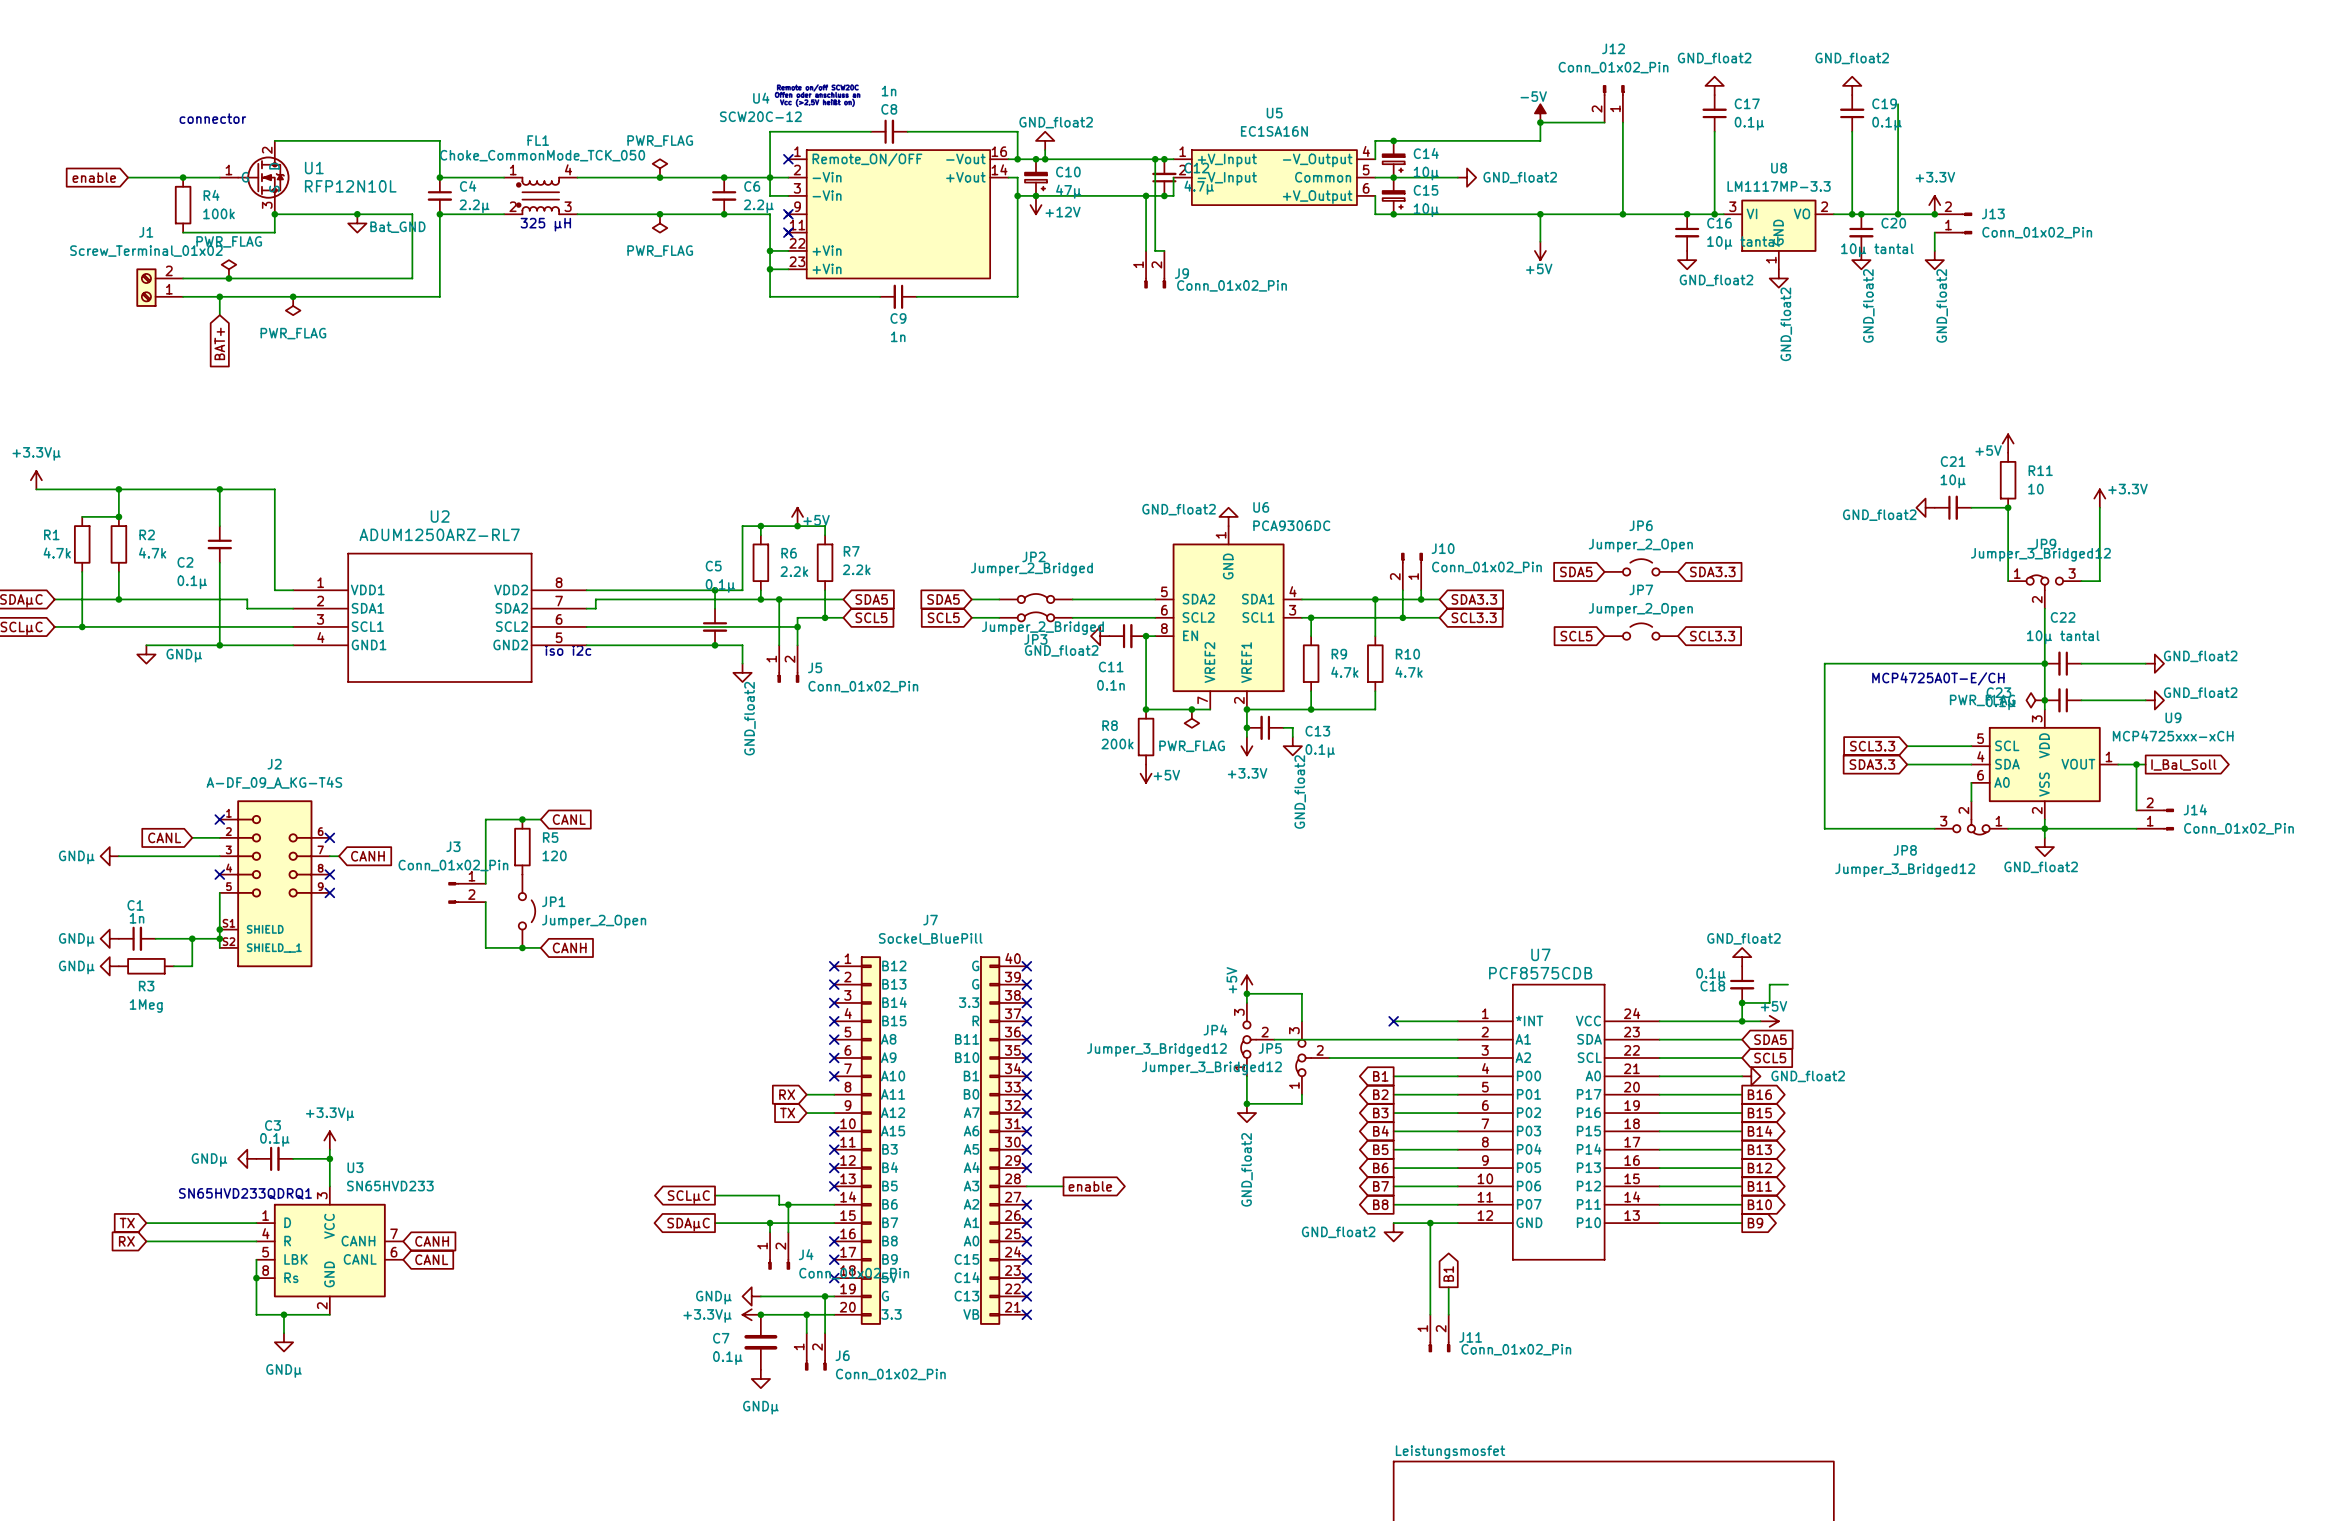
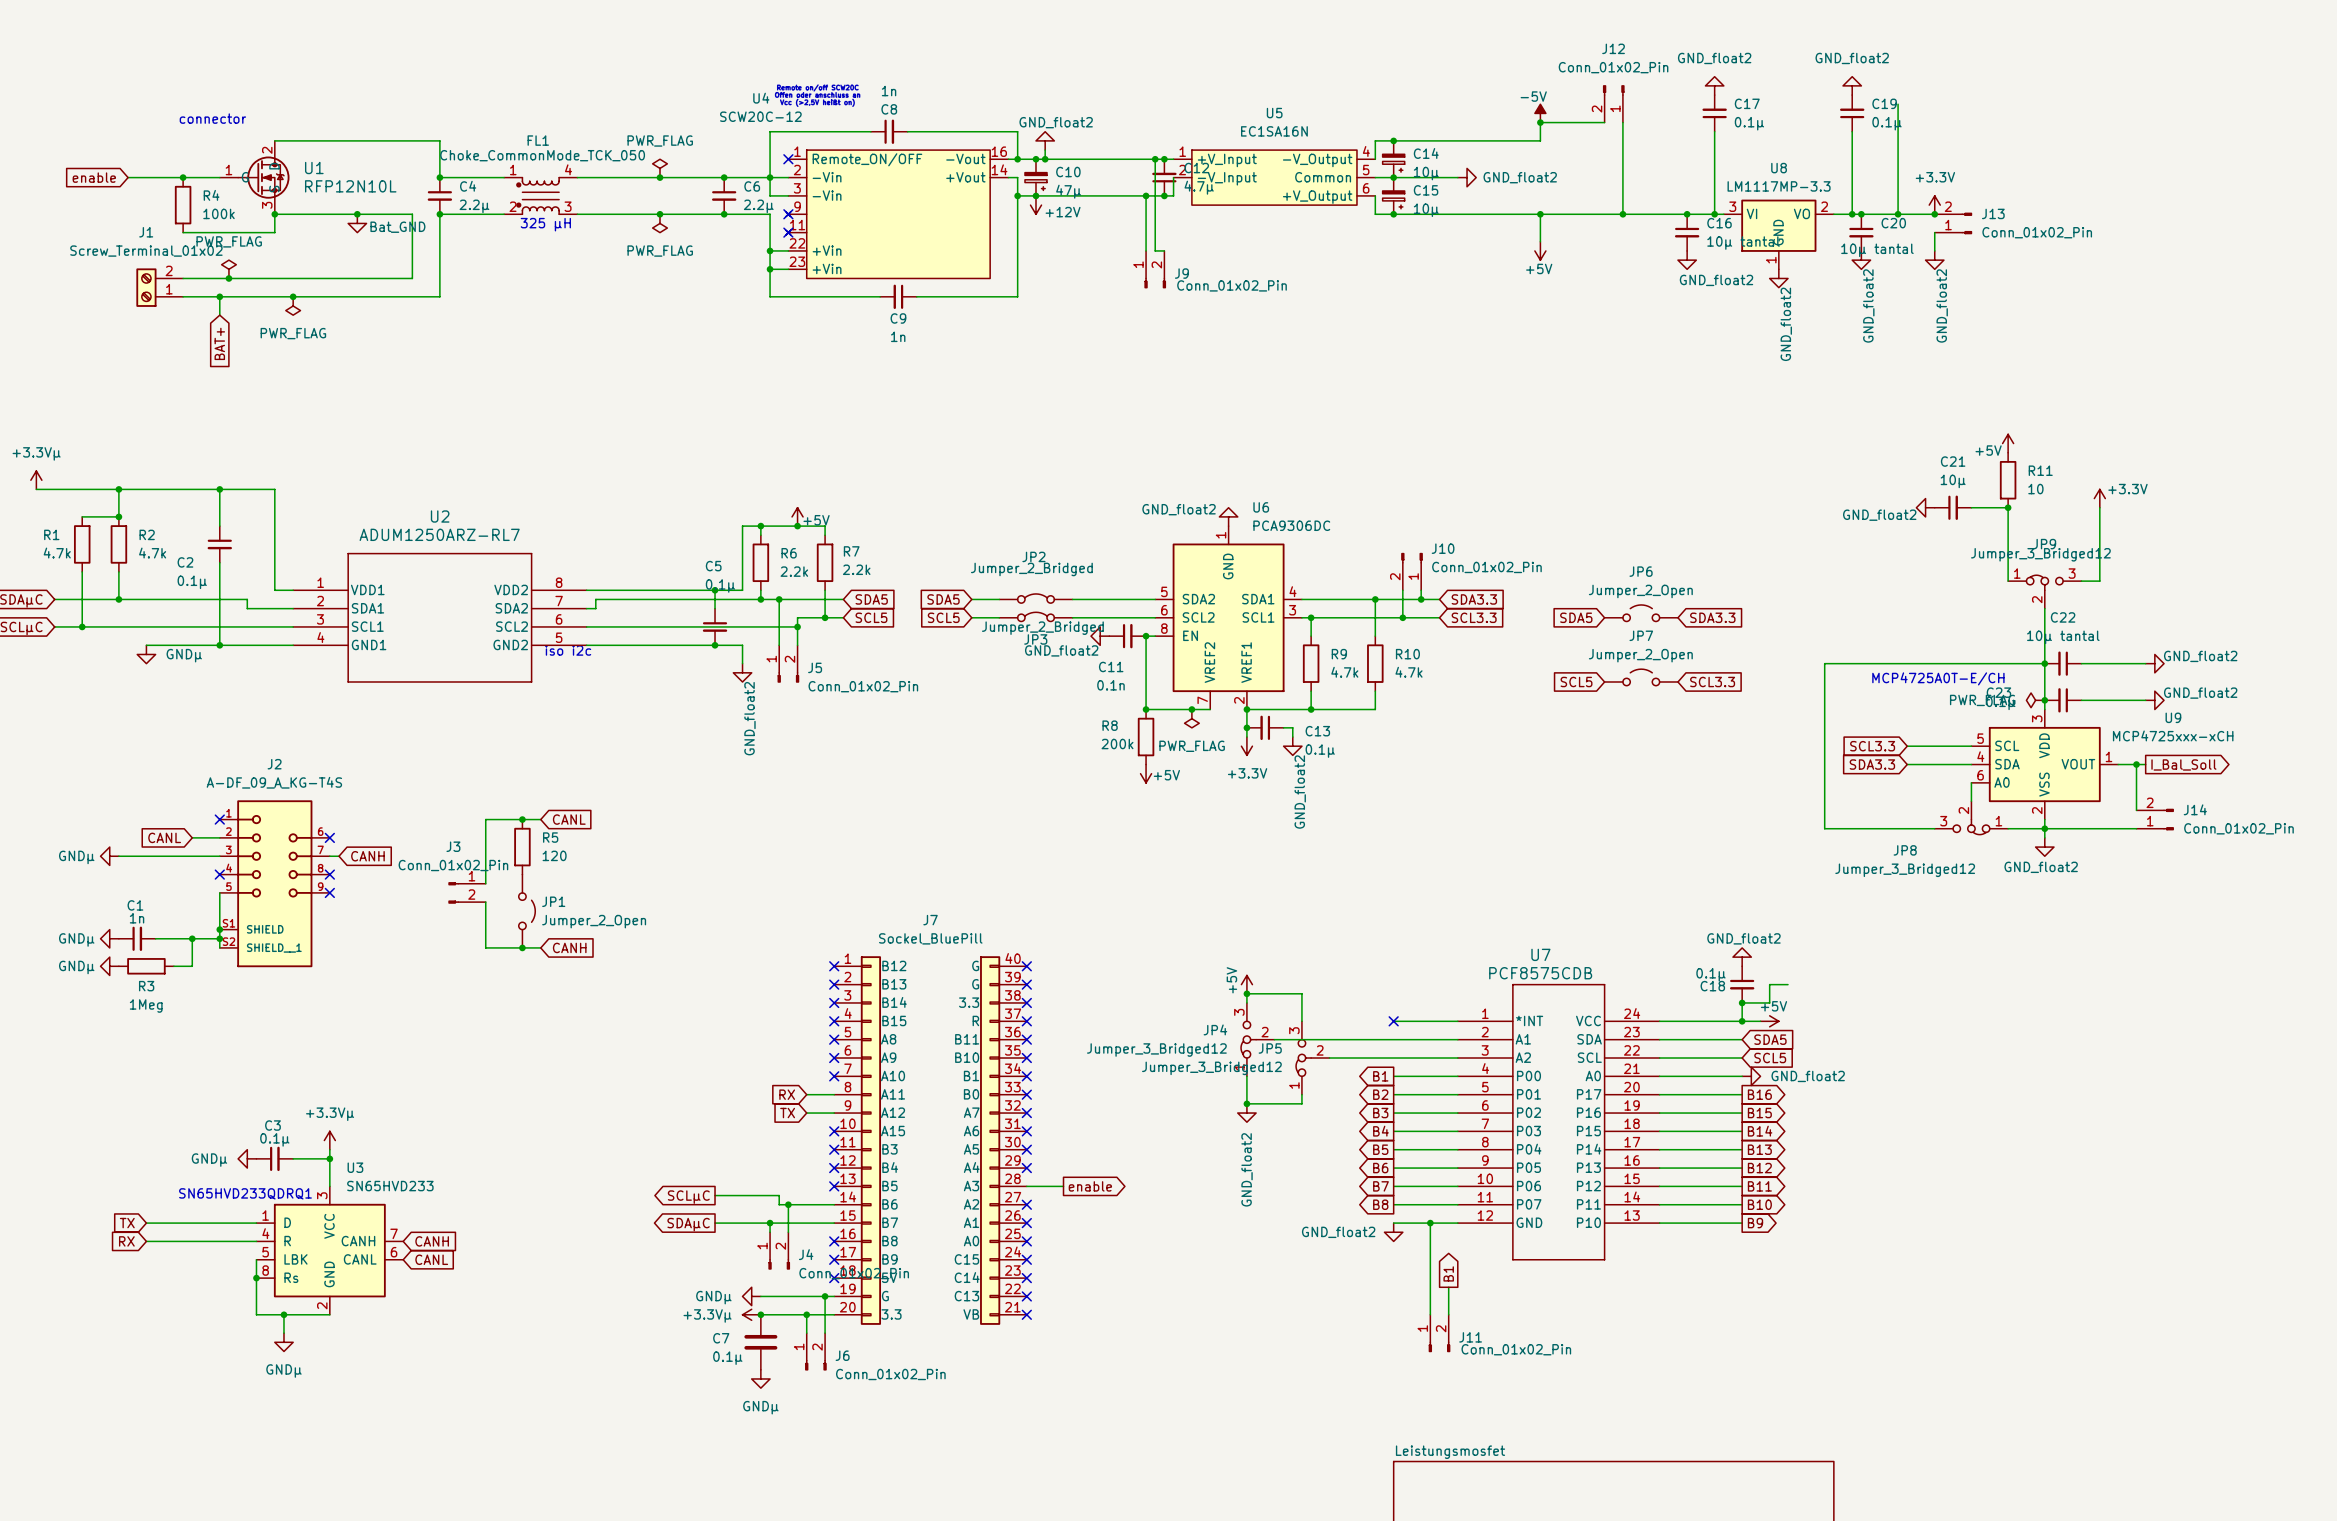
JP6 position: (1641, 567) -> (1641, 613)
global label position: SDA5 (1576, 571) -> SDA5 (1576, 617)
global label position: SDA3.3 (1712, 571) -> SDA3.3 (1712, 617)
JP7 position: (1641, 631) -> (1641, 677)
global label position: SCL5 (1576, 636) -> SCL5 (1576, 681)
global label position: SCL3.3 (1712, 636) -> SCL3.3 (1712, 681)

